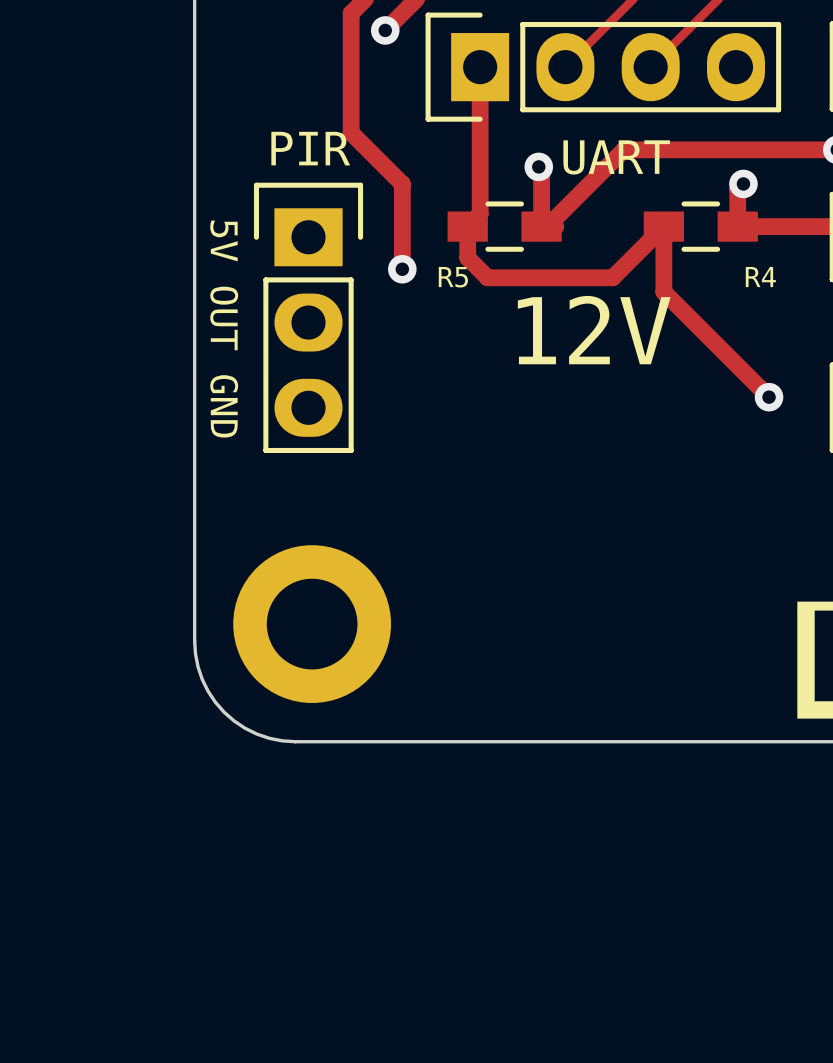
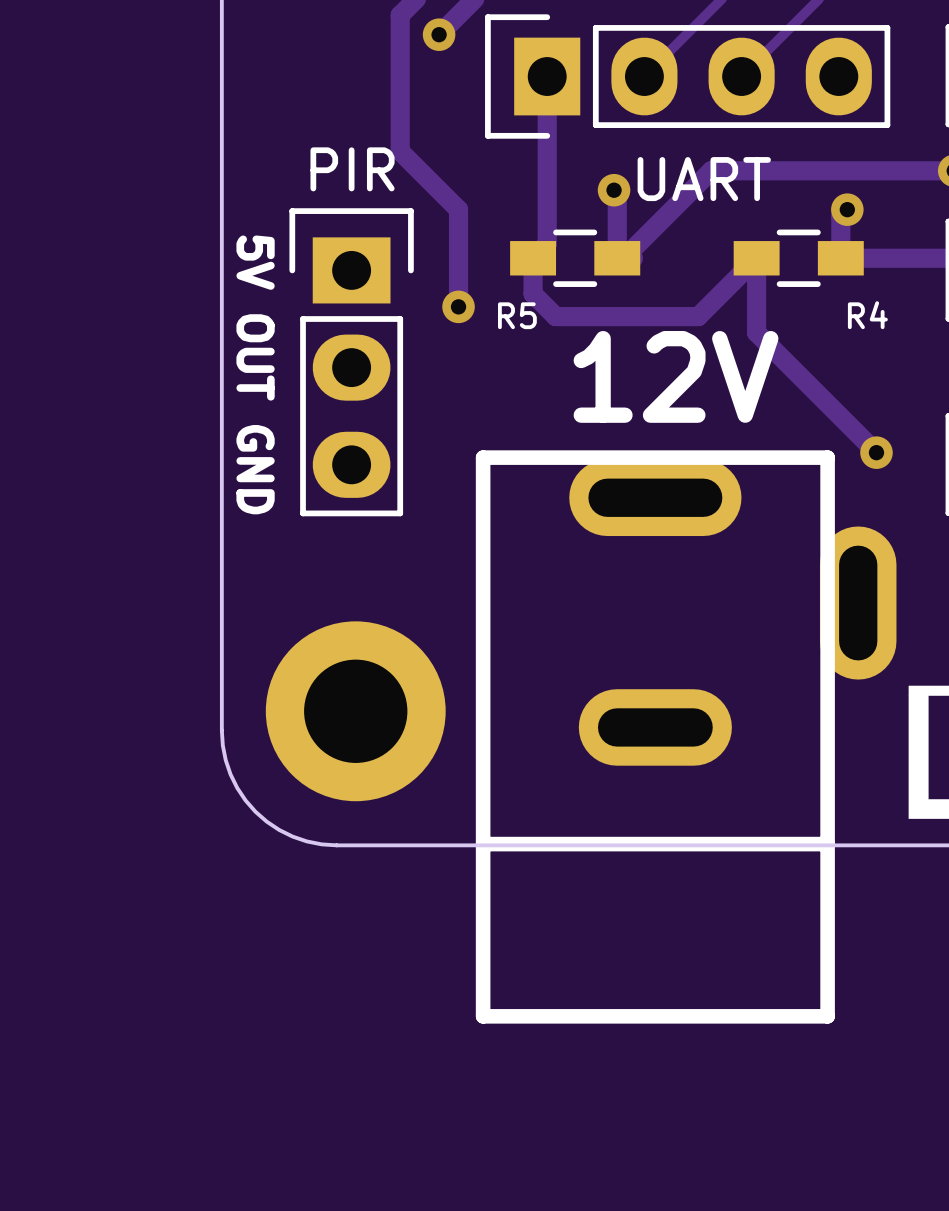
part: none -> (686, 736)

